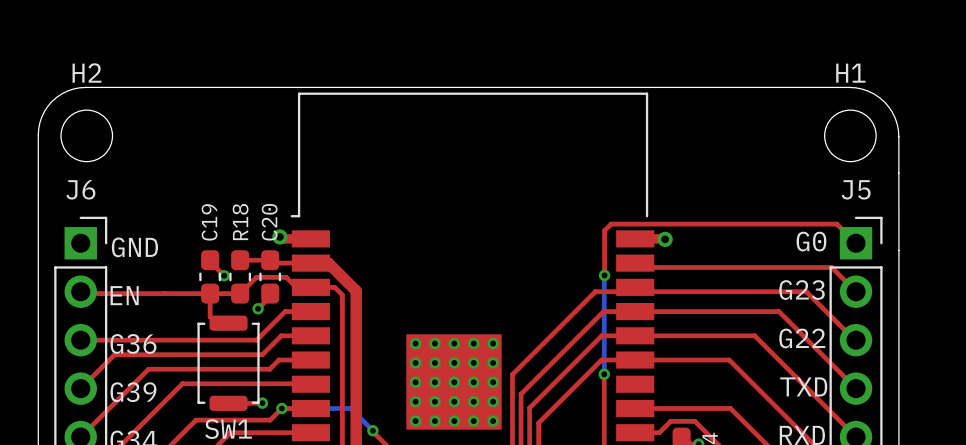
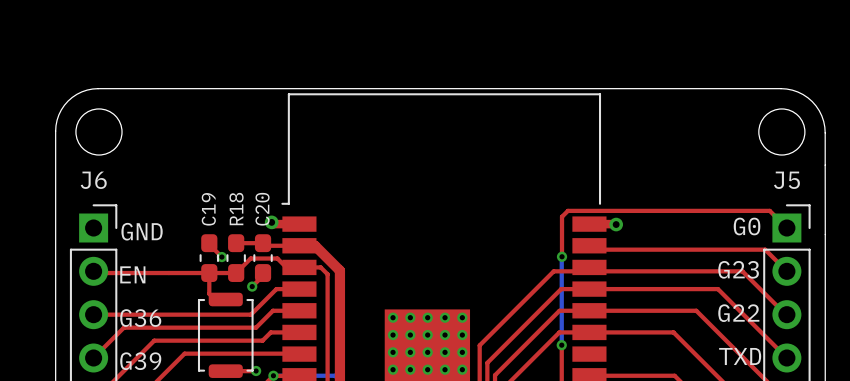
H2 name: H2 (86, 73) -> none
H1 name: H1 (850, 73) -> none

